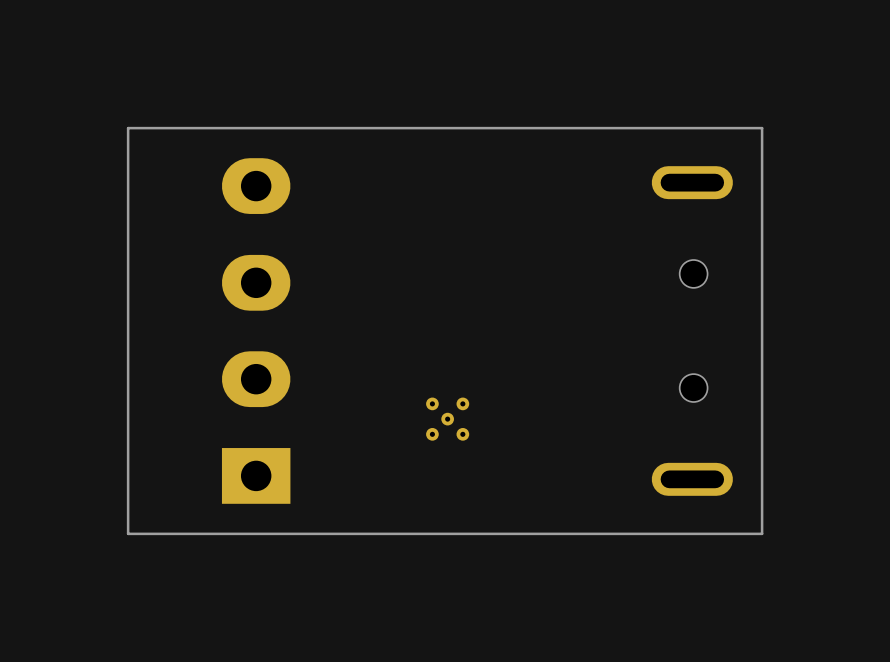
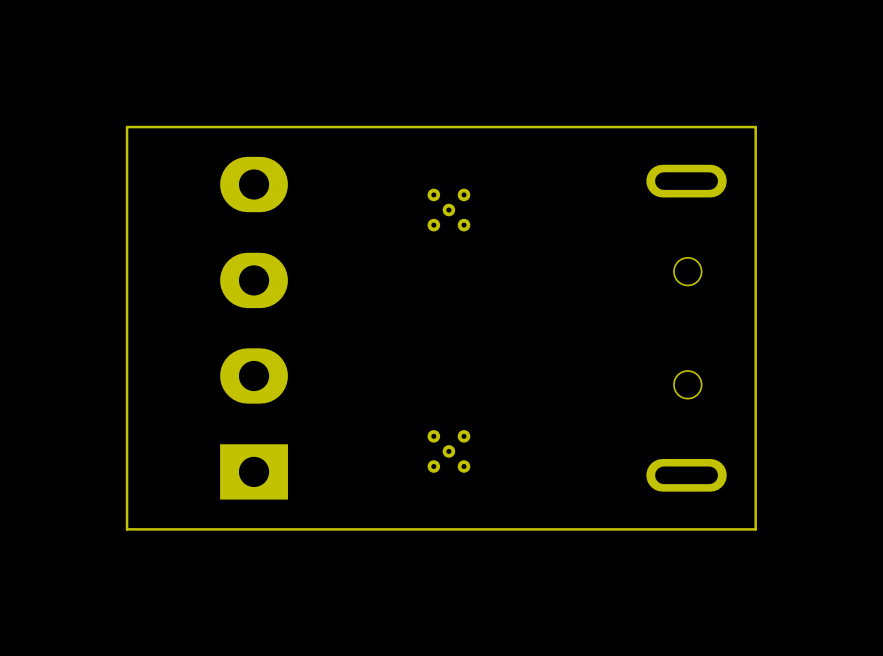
part: none -> (448, 210)
part position: (447, 419) -> (448, 451)

